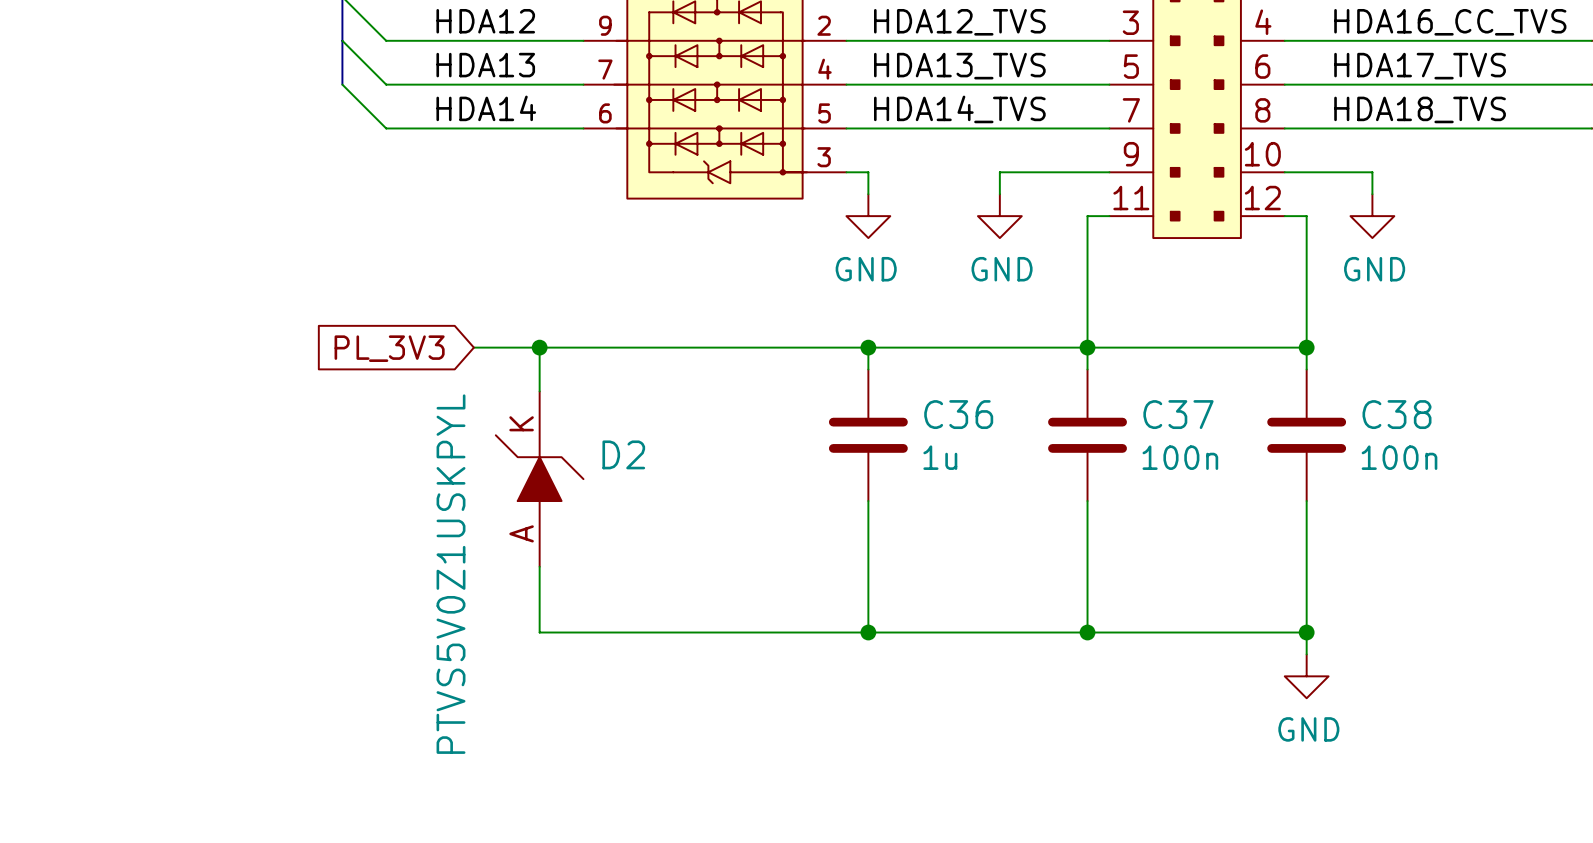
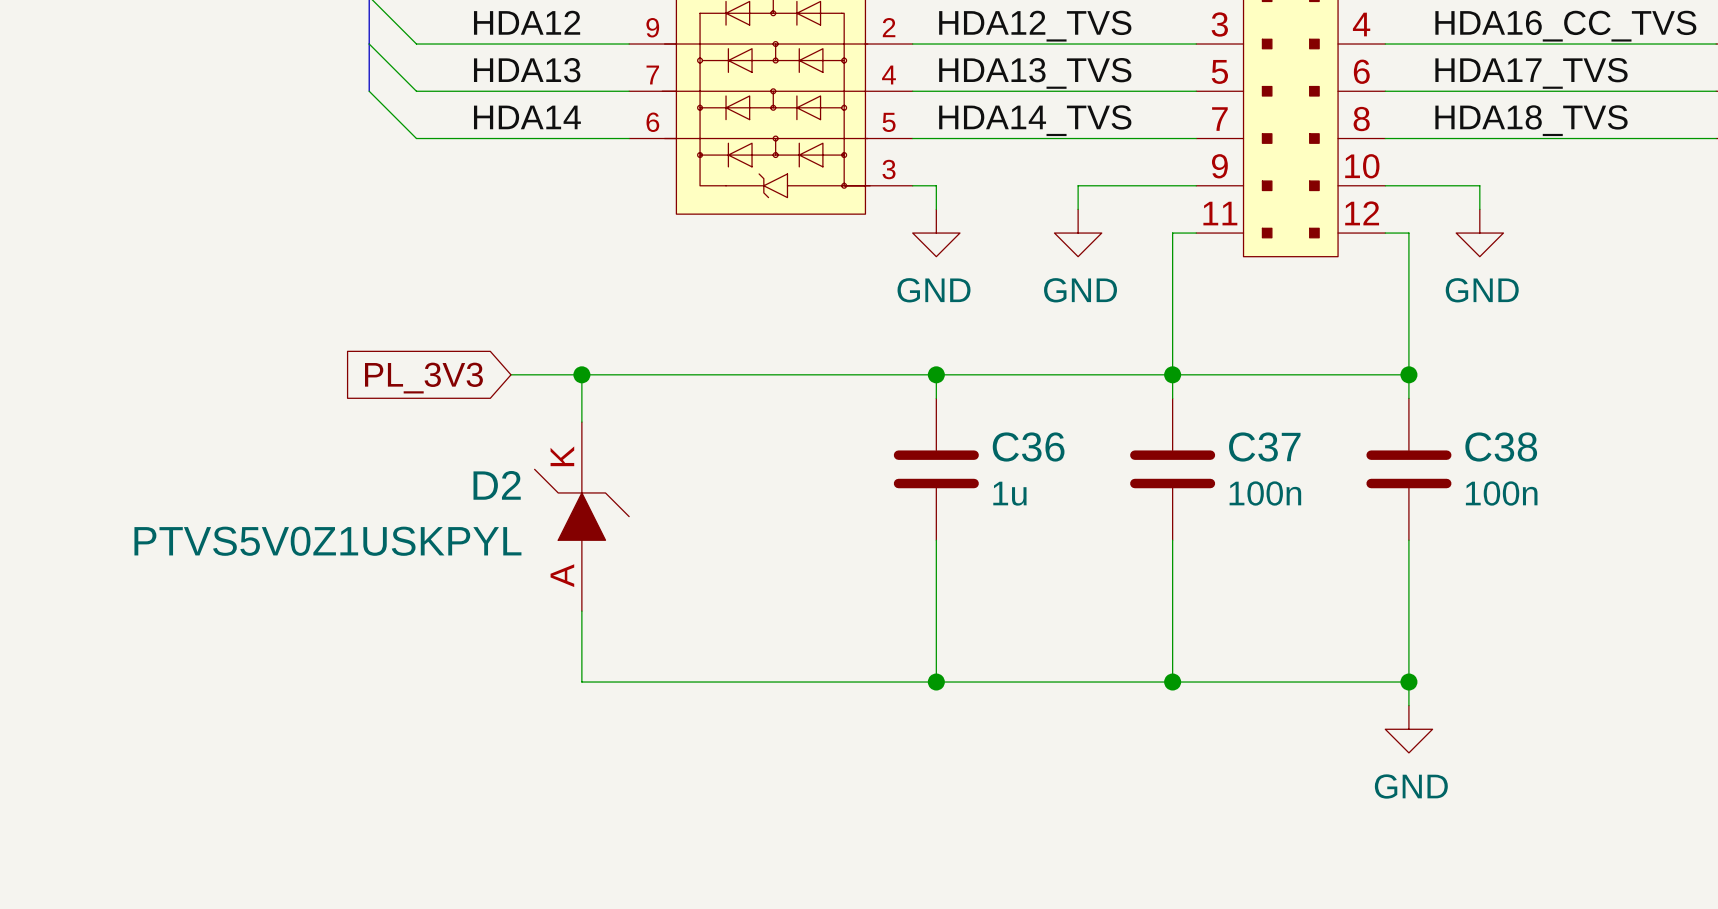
D2 name position: D2 (623, 454) -> D2 (497, 485)
D2 value rotation: 0° (451, 574) -> 90° clockwise (327, 541)

